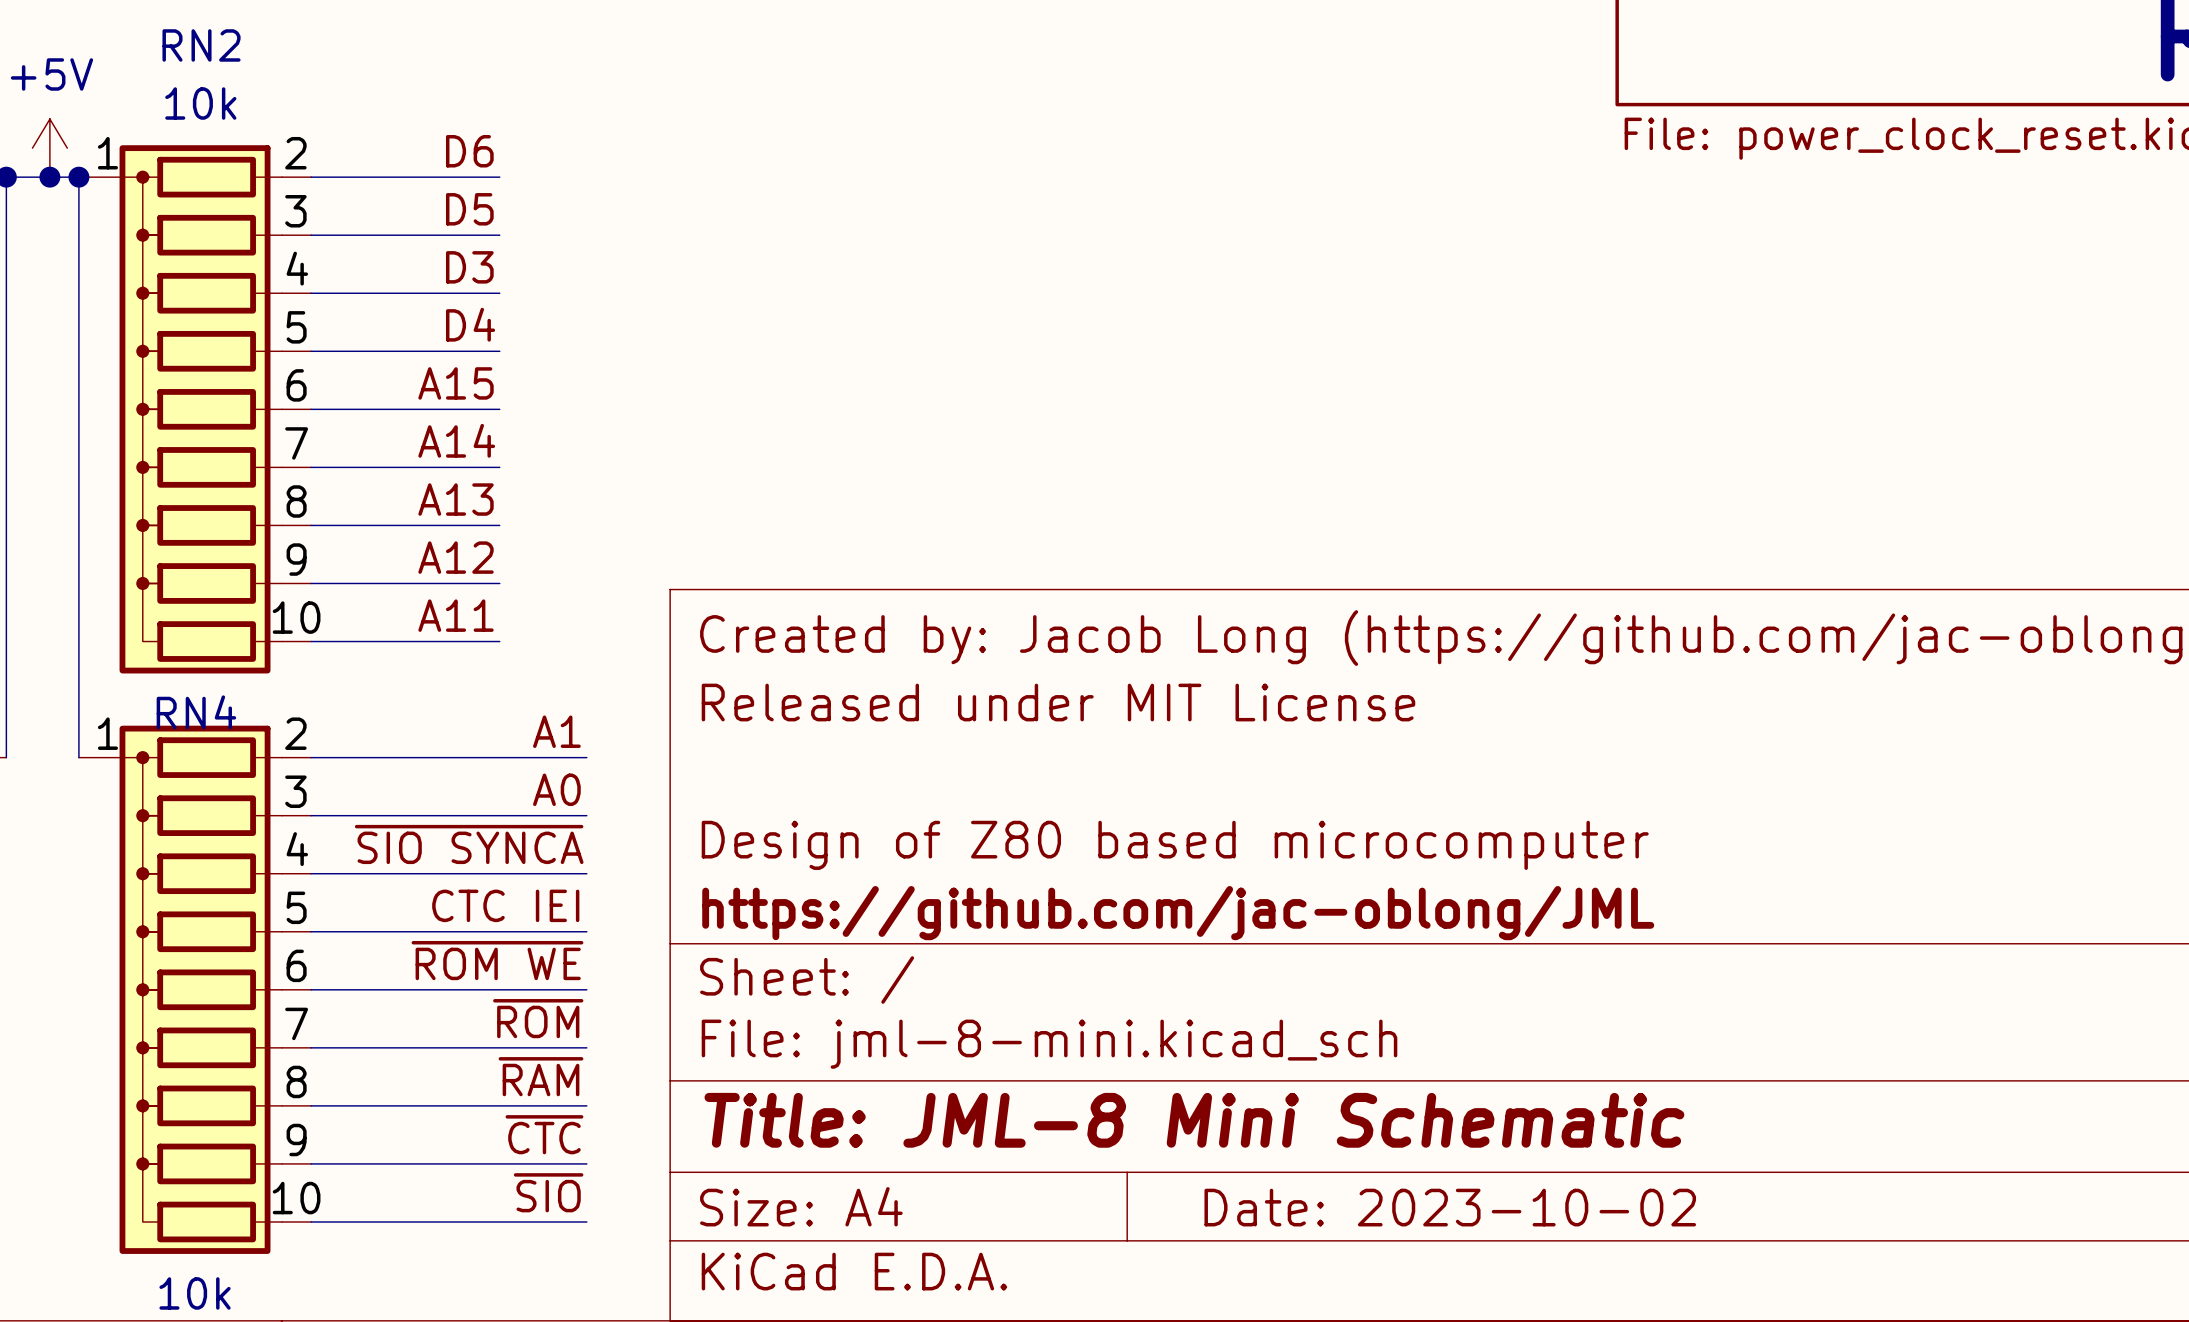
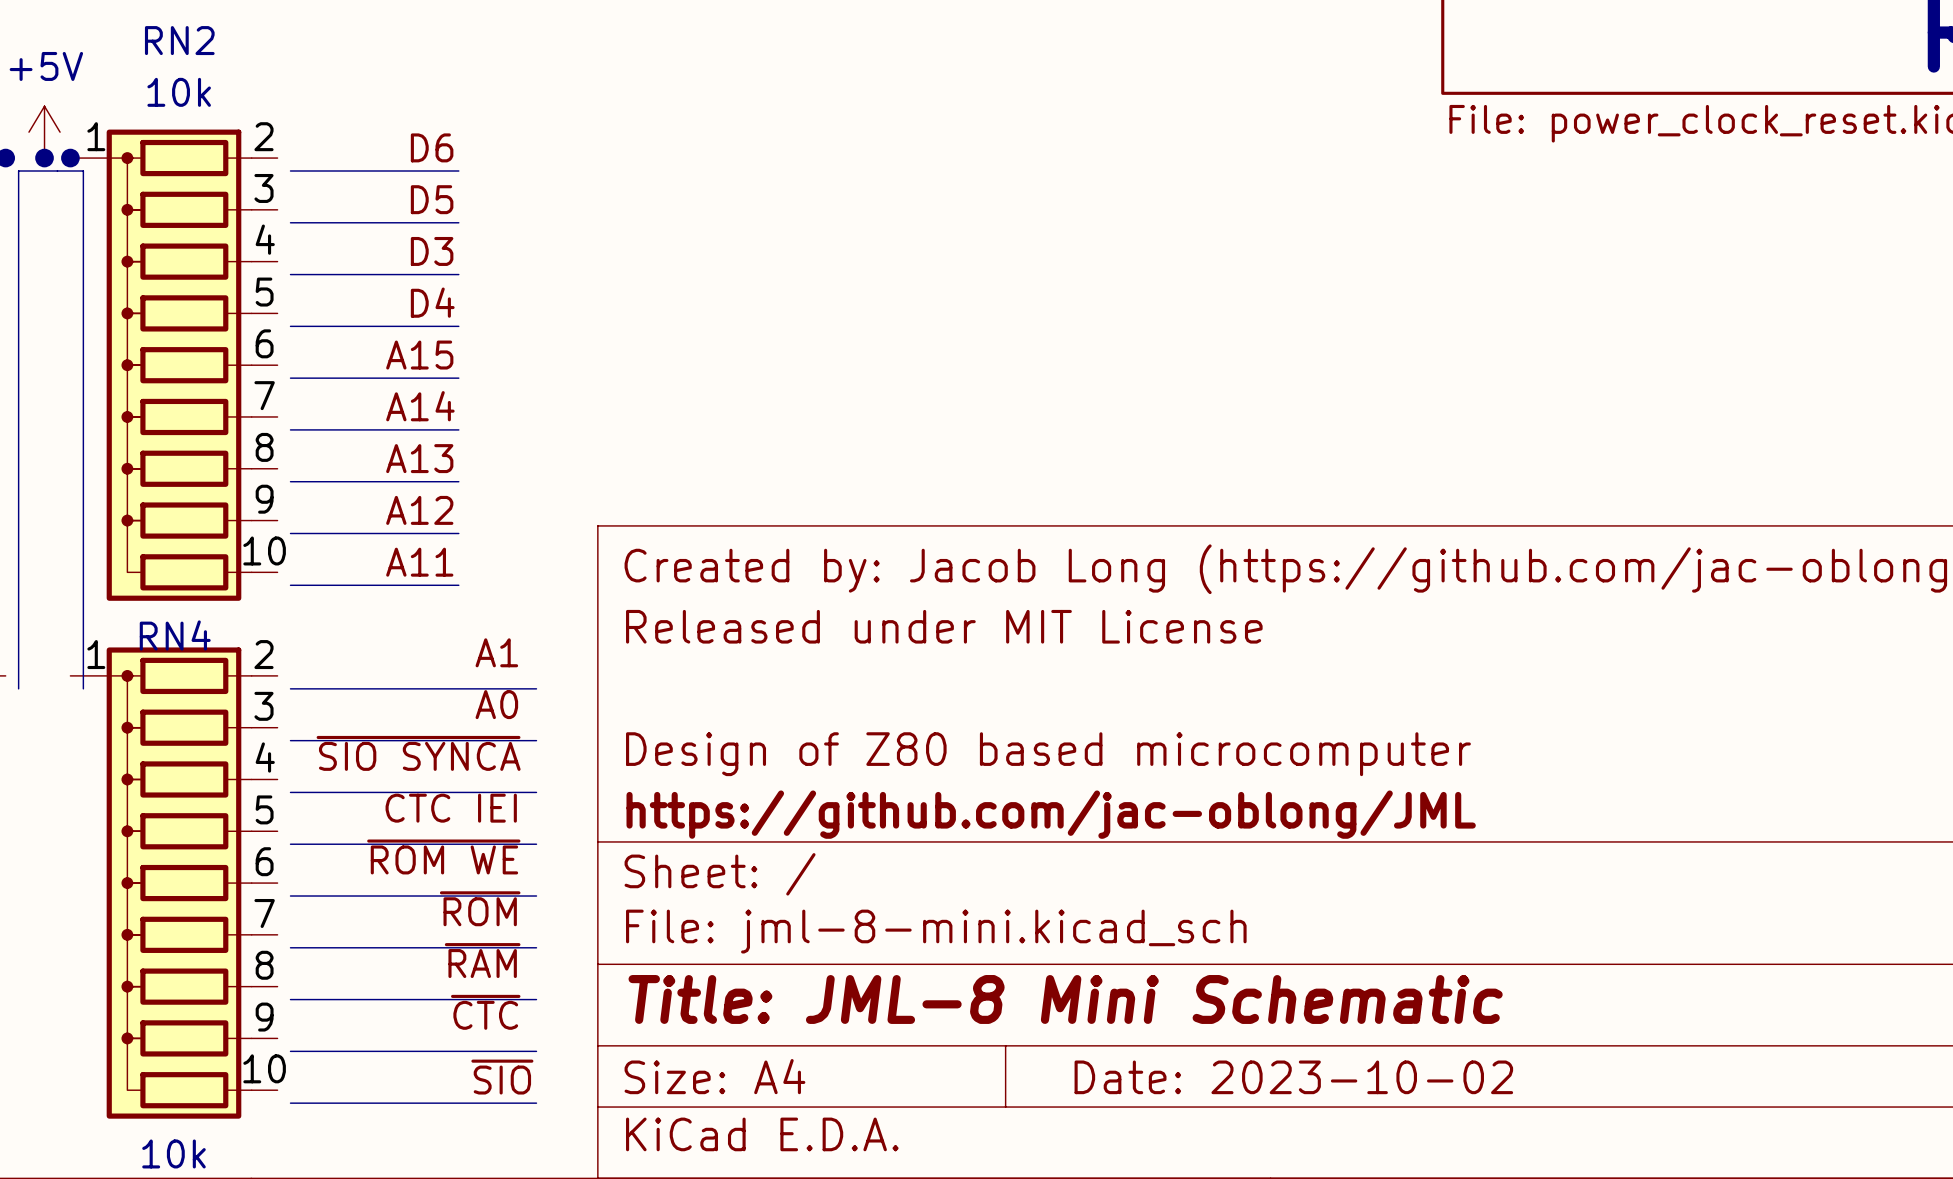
label position: D6 (469, 151) -> D6 (432, 147)
wire: (311, 177) (499, 177) -> (290, 170) (458, 170)
label position: D5 (469, 209) -> D5 (432, 199)
wire: (311, 235) (499, 235) -> (290, 222) (458, 222)
label position: D3 (469, 267) -> D3 (432, 251)
wire: (311, 293) (499, 293) -> (290, 274) (458, 274)
label position: D4 (470, 324) -> D4 (432, 302)
wire: (311, 351) (499, 351) -> (290, 326) (458, 326)
label position: A15 (456, 383) -> A15 (419, 355)
wire: (311, 409) (499, 409) -> (290, 378) (458, 378)
label position: A14 (456, 440) -> A14 (420, 406)
wire: (311, 467) (499, 467) -> (290, 429) (458, 429)
label position: A13 (456, 499) -> A13 (419, 458)
wire: (311, 525) (499, 525) -> (290, 481) (458, 481)
label position: A12 (456, 557) -> A12 (419, 510)
wire: (311, 583) (499, 583) -> (290, 533) (458, 533)
label position: A11 (456, 615) -> A11 (419, 562)
wire: (311, 641) (499, 641) -> (290, 585) (458, 585)
wire: (6, 757) (6, 177) (78, 177) (78, 757) -> (18, 688) (18, 170) (83, 170) (83, 688)
wire: (311, 757) (586, 757) -> (290, 688) (536, 688)
wire: (311, 815) (586, 815) -> (290, 740) (536, 740)
wire: (311, 873) (586, 873) -> (290, 792) (536, 792)
wire: (311, 931) (586, 931) -> (290, 844) (536, 844)
wire: (311, 989) (586, 989) -> (290, 896) (536, 896)
wire: (311, 1047) (586, 1047) -> (290, 947) (536, 947)
wire: (311, 1105) (586, 1105) -> (290, 999) (536, 999)
wire: (311, 1163) (586, 1163) -> (290, 1051) (536, 1051)
label position: ~{SIO} (548, 1192) -> ~{SIO} (502, 1077)
wire: (311, 1222) (586, 1222) -> (290, 1103) (536, 1103)

